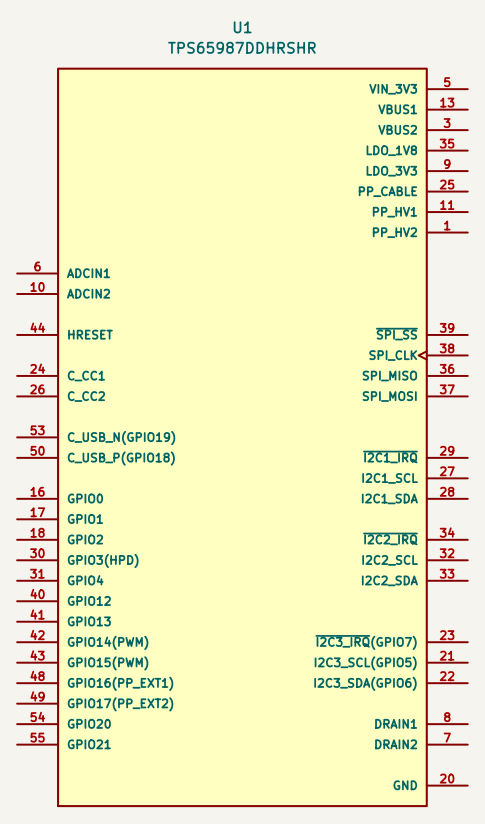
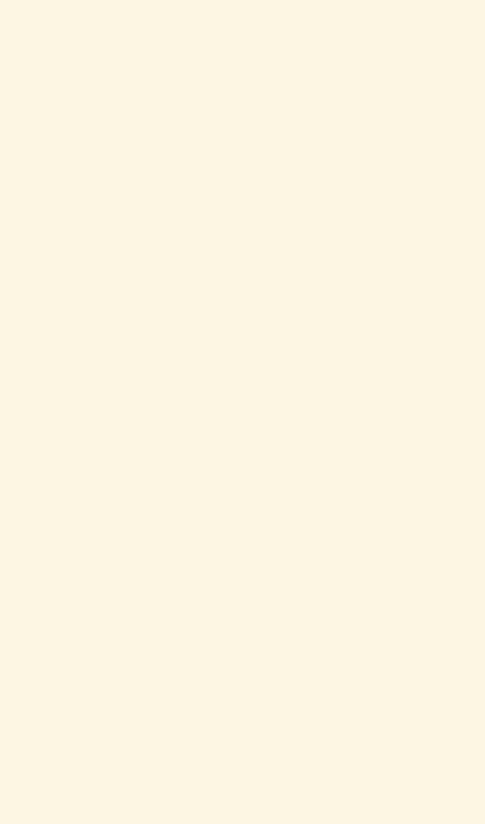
U1: TPS65987DDHRSHR (242, 437) -> none

